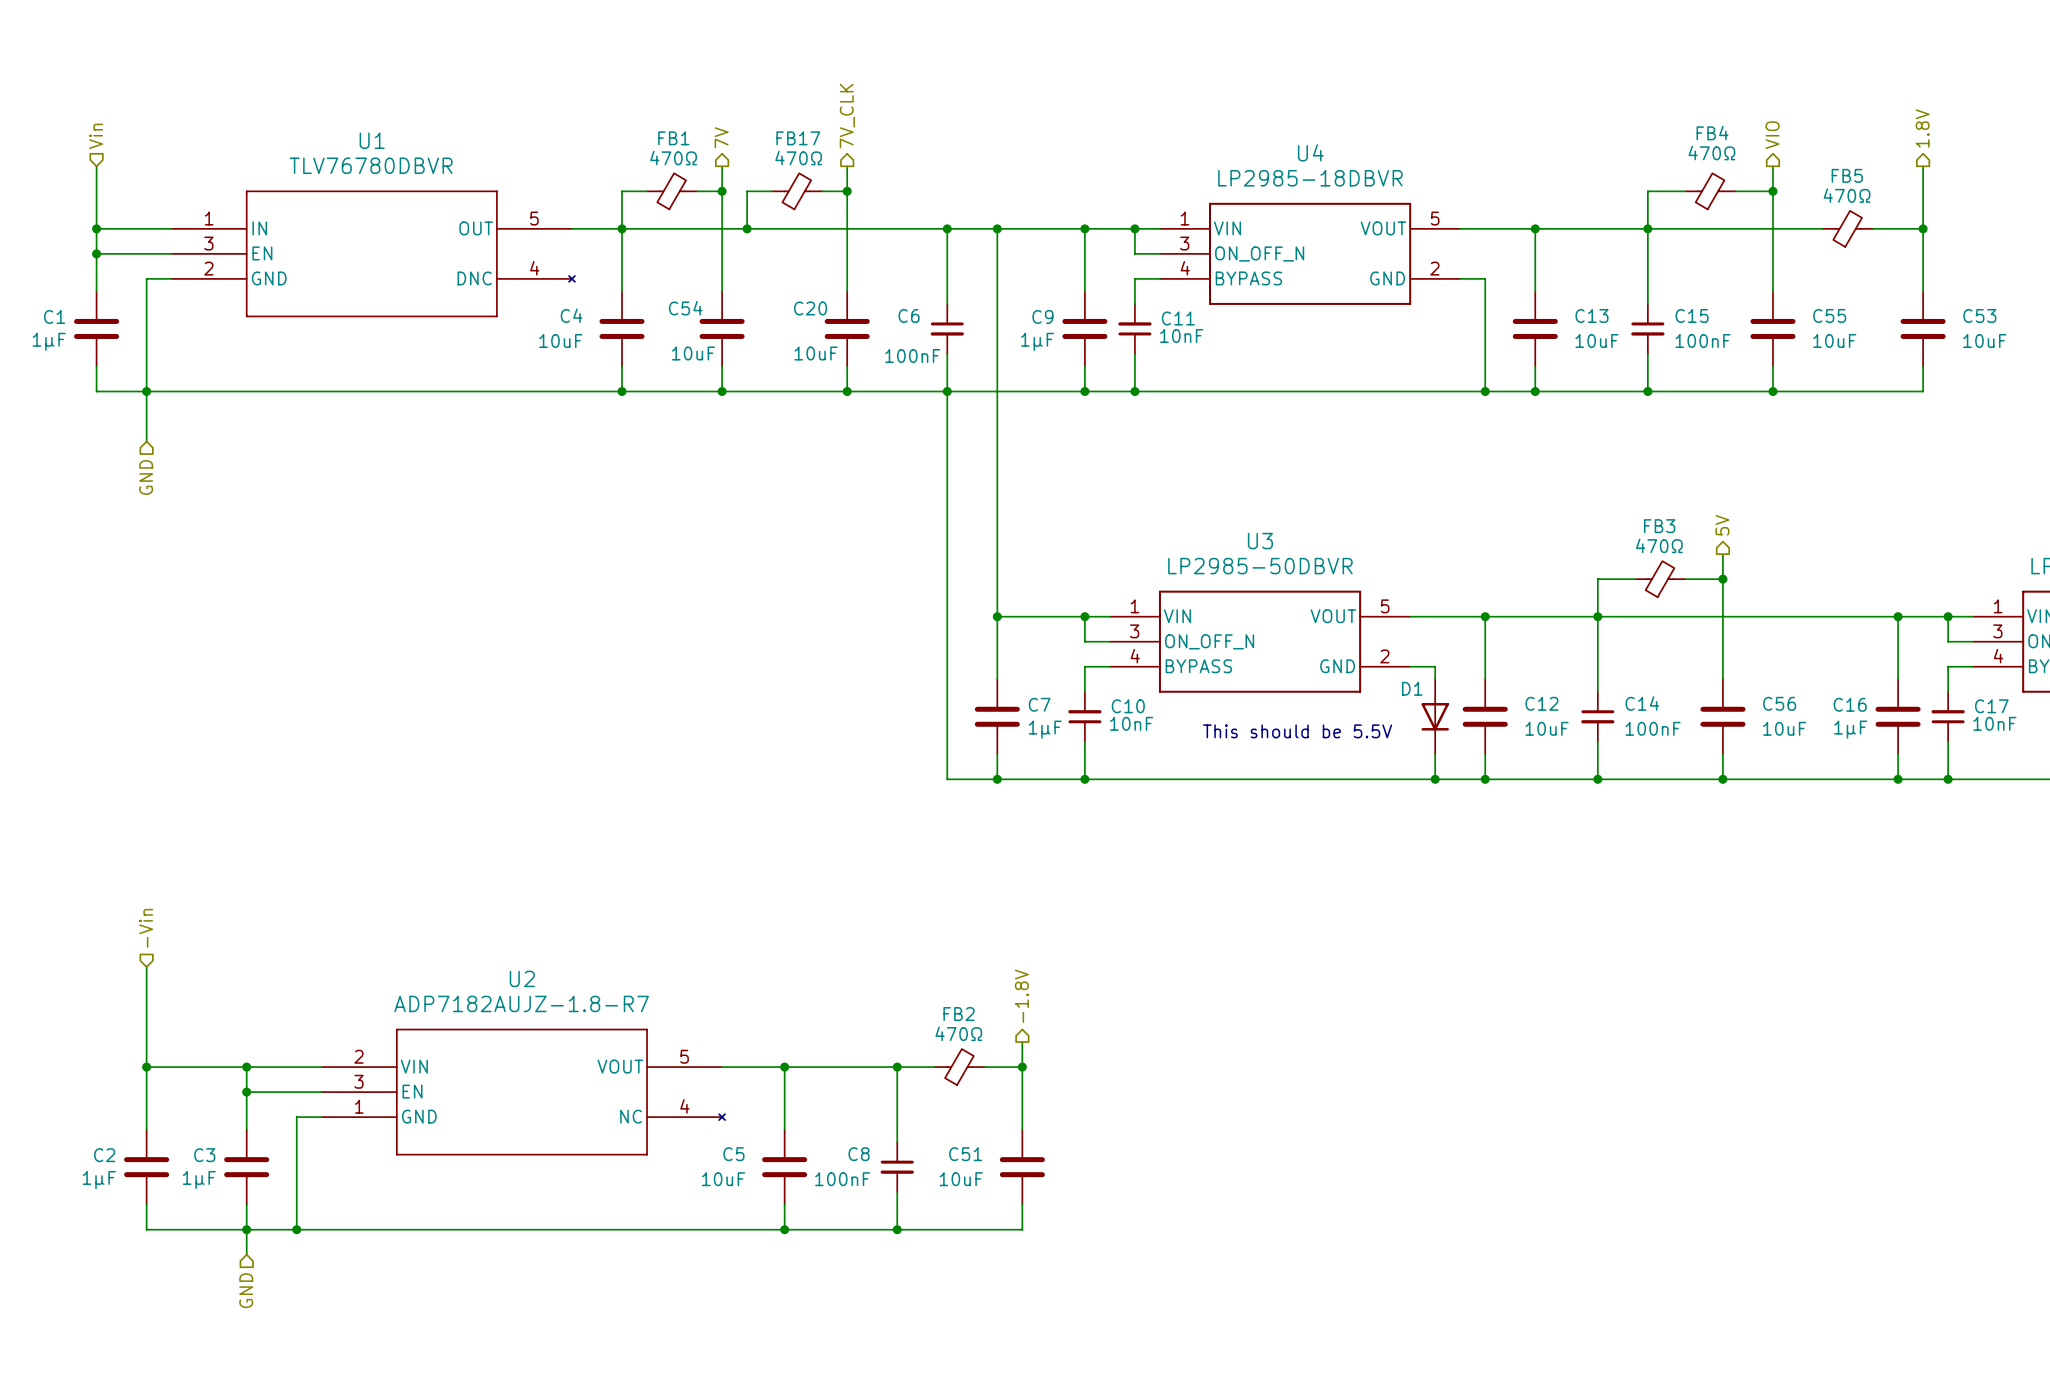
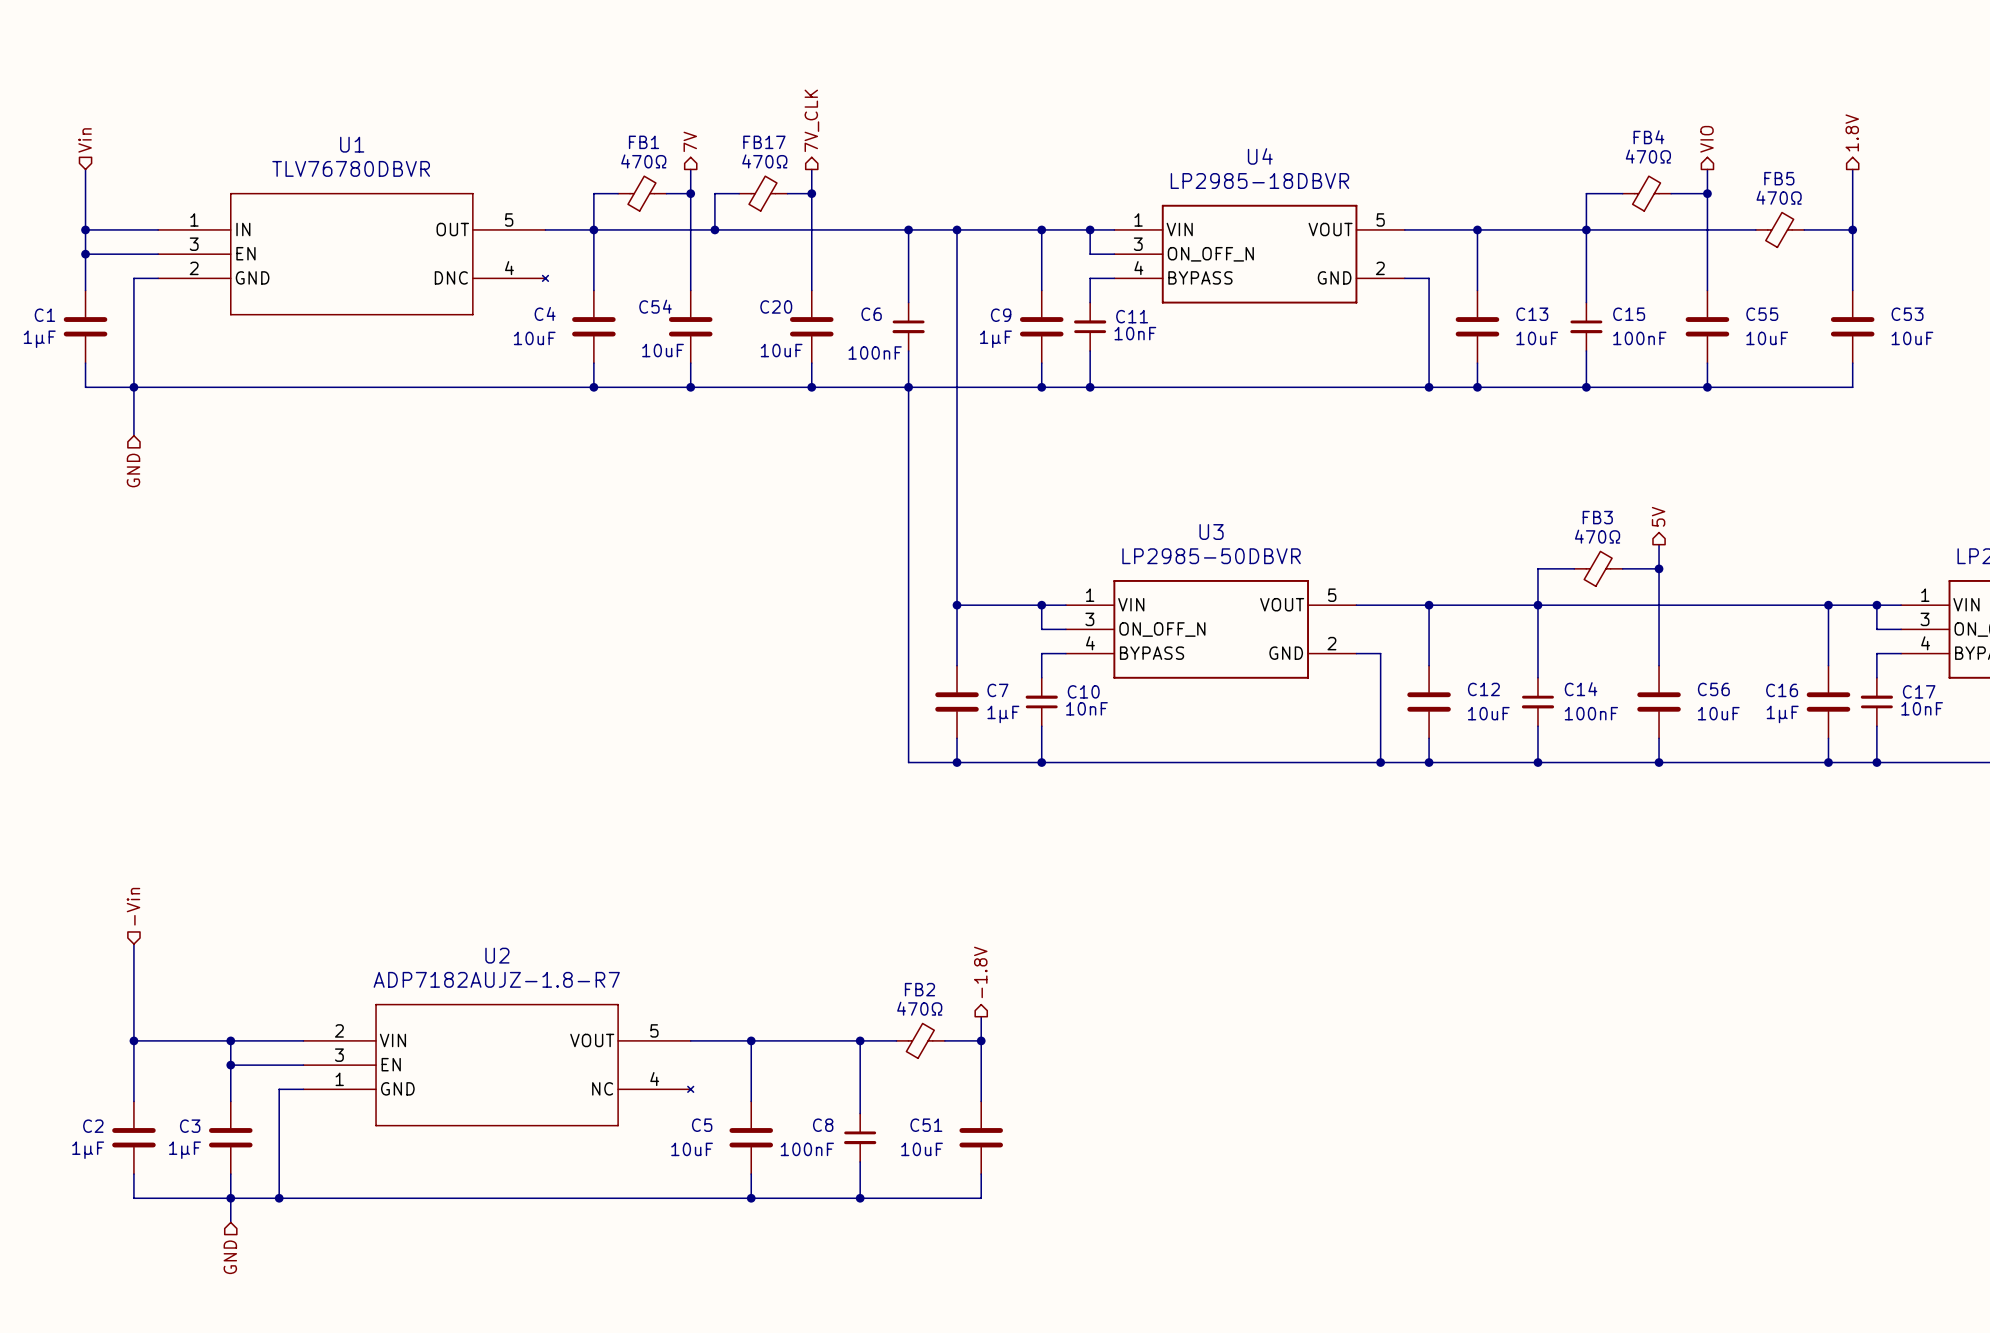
D1: (1435, 716) -> none
text: This should be 5.5V (1297, 731) -> none

